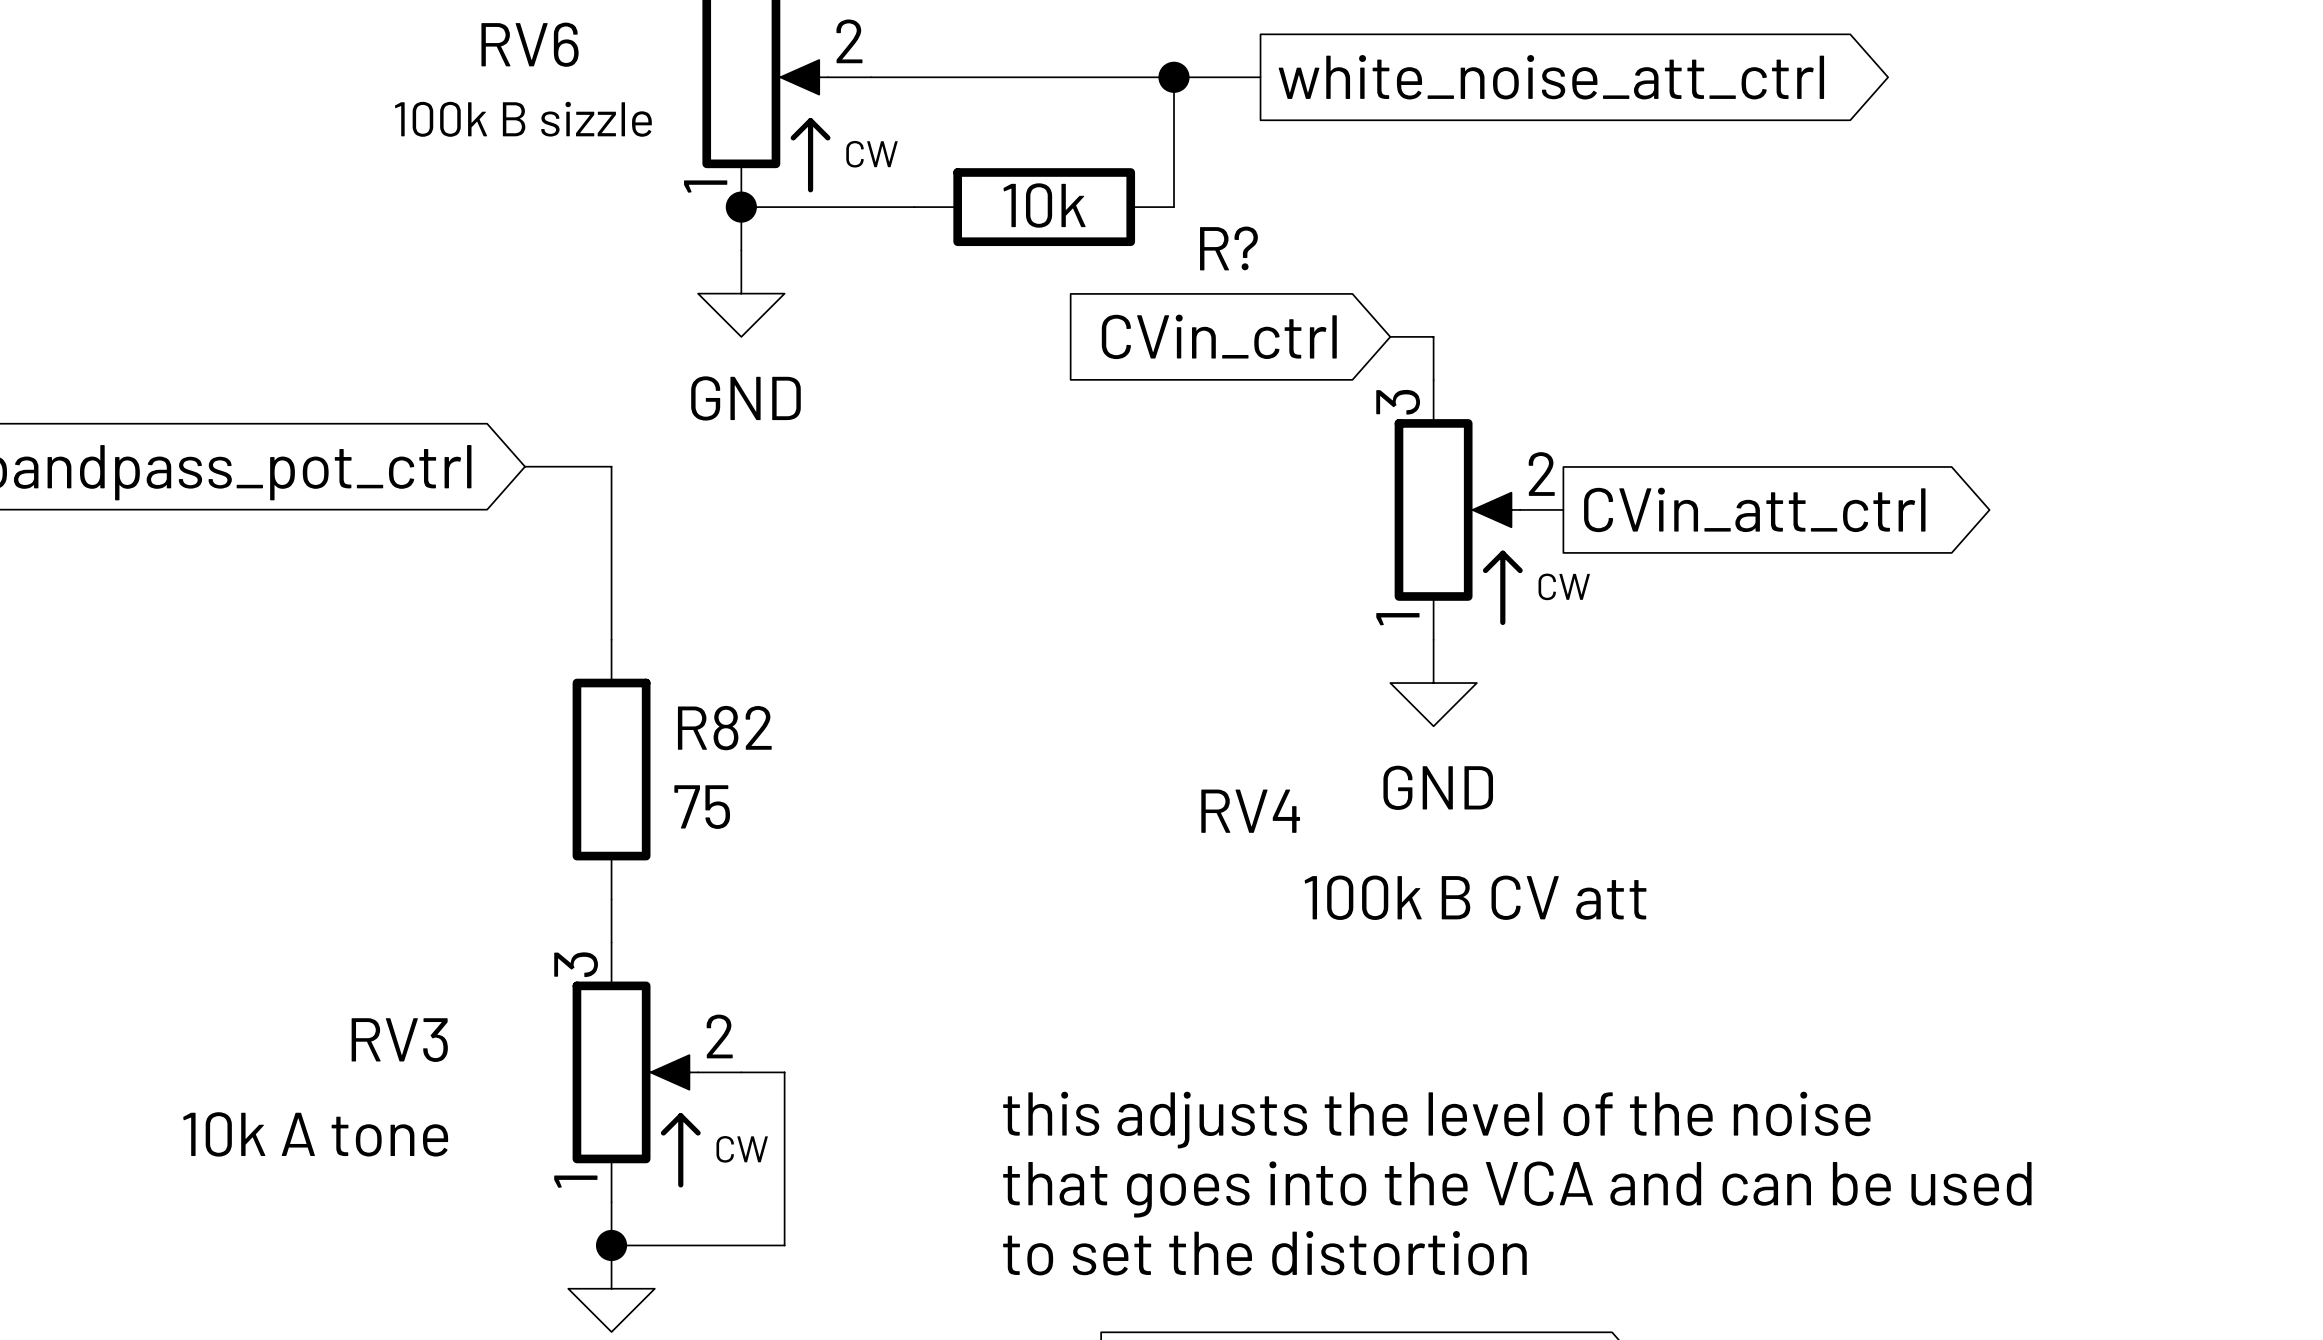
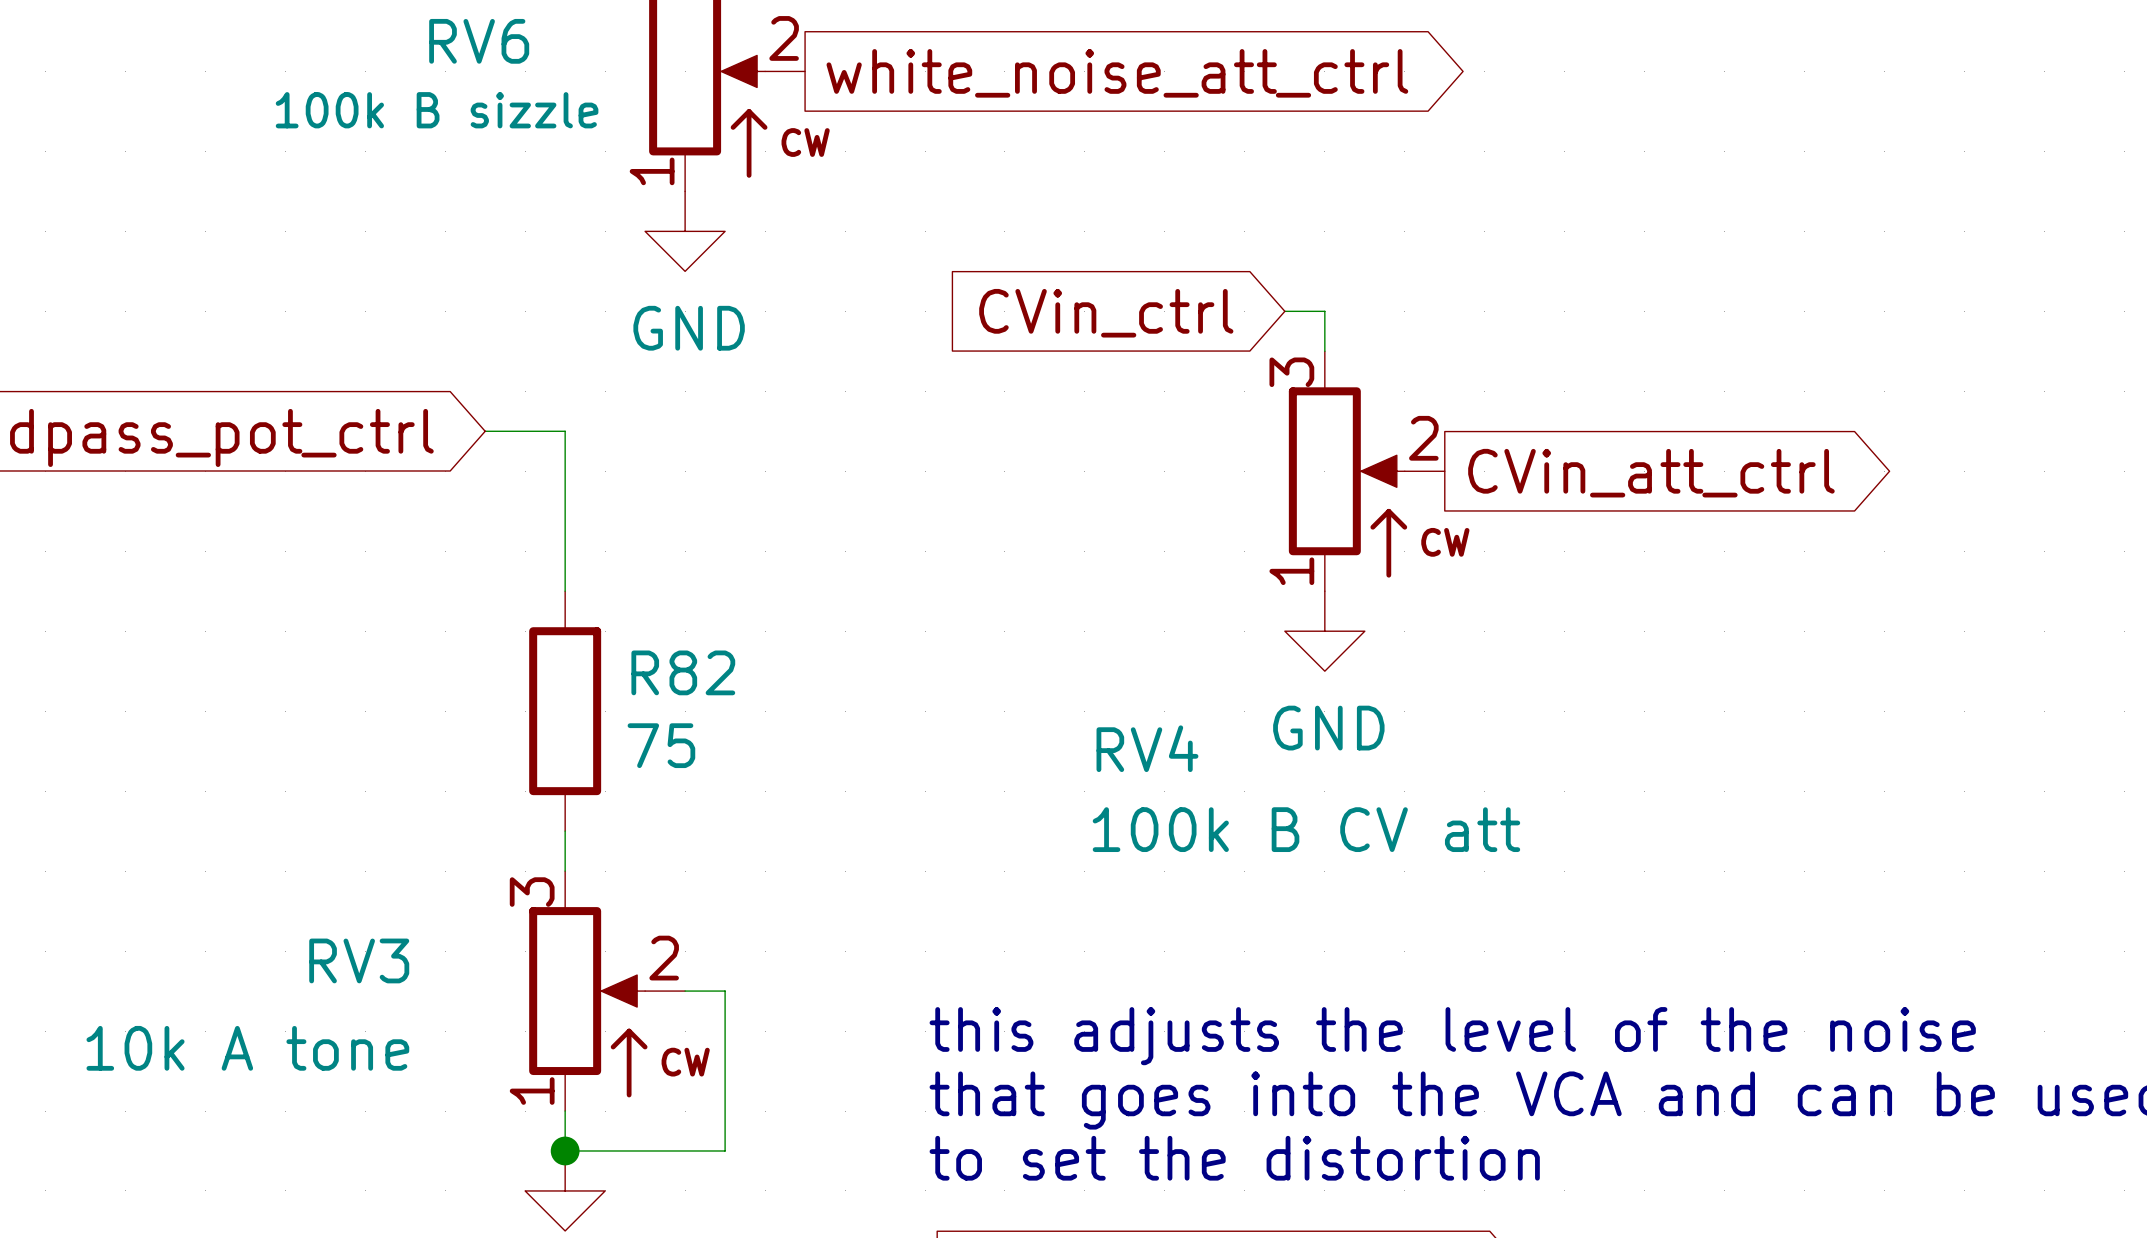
wire: (871, 77) (1260, 77) -> none
wire: (1174, 77) (1174, 207) -> none
junction: (1174, 77) -> none
global label position: white_noise_att_ctrl (1551, 77) -> white_noise_att_ctrl (1117, 73)
junction: (741, 207) -> none
wire: (914, 207) (741, 207) (741, 250) -> none
R?: 10k (1044, 207) -> none
power symbol position: GND (741, 293) -> GND (685, 231)

